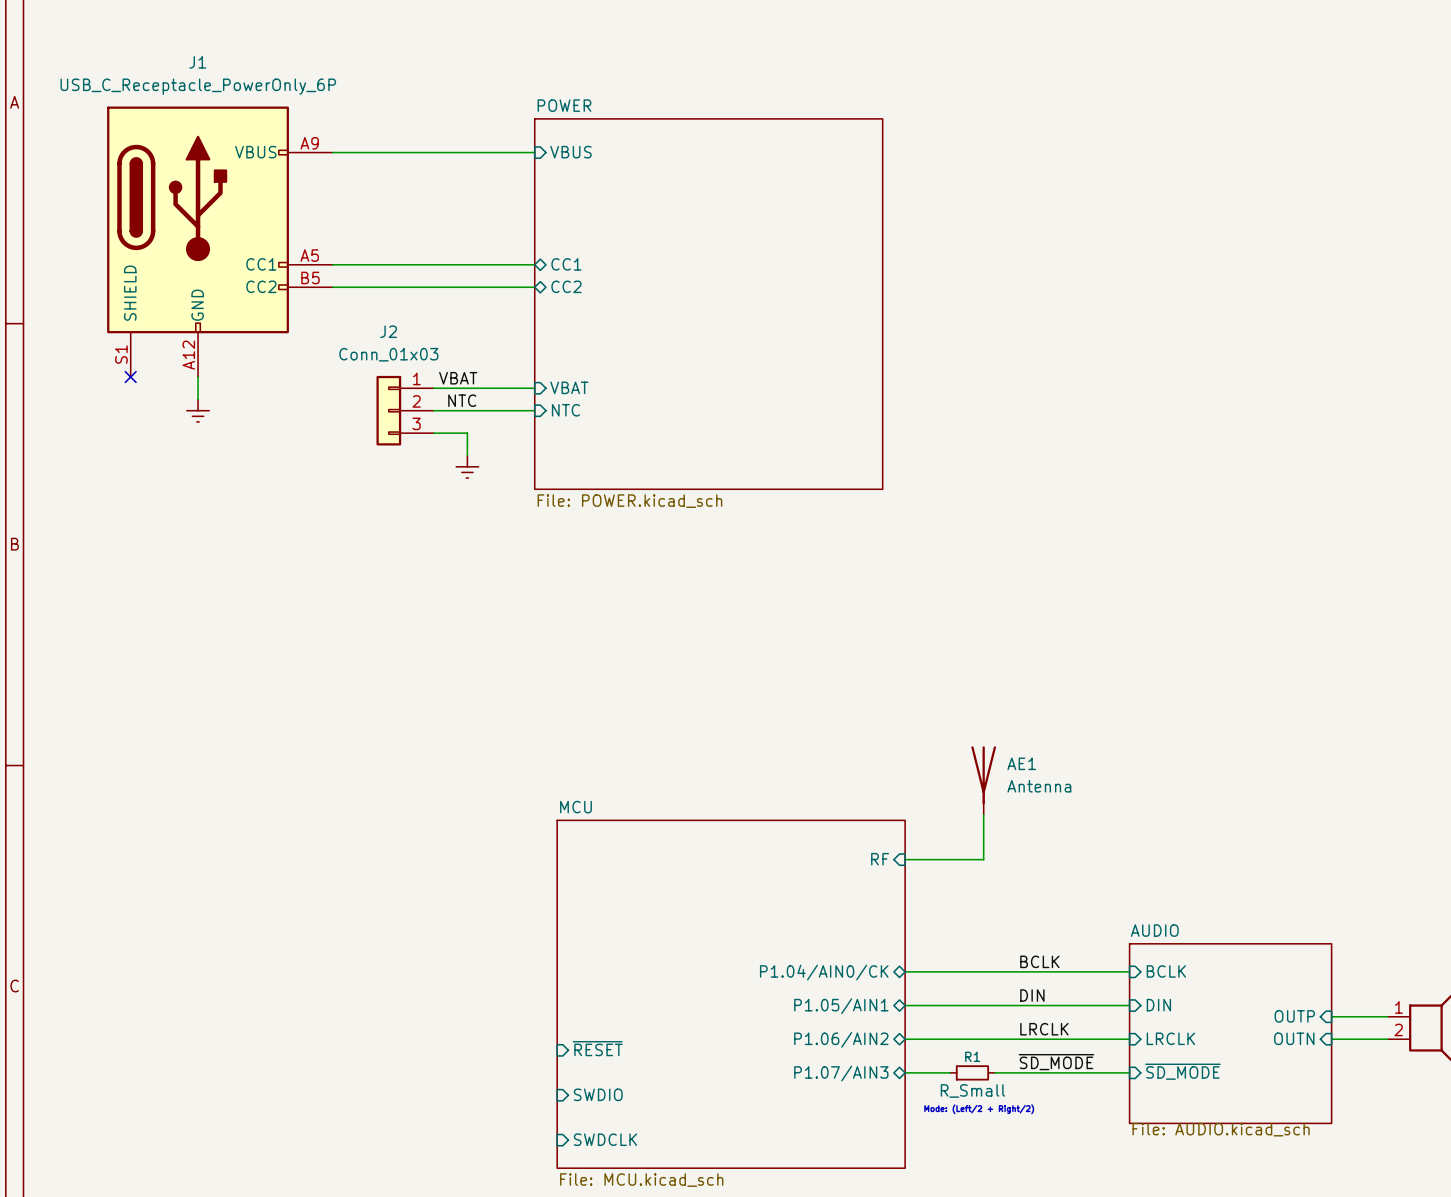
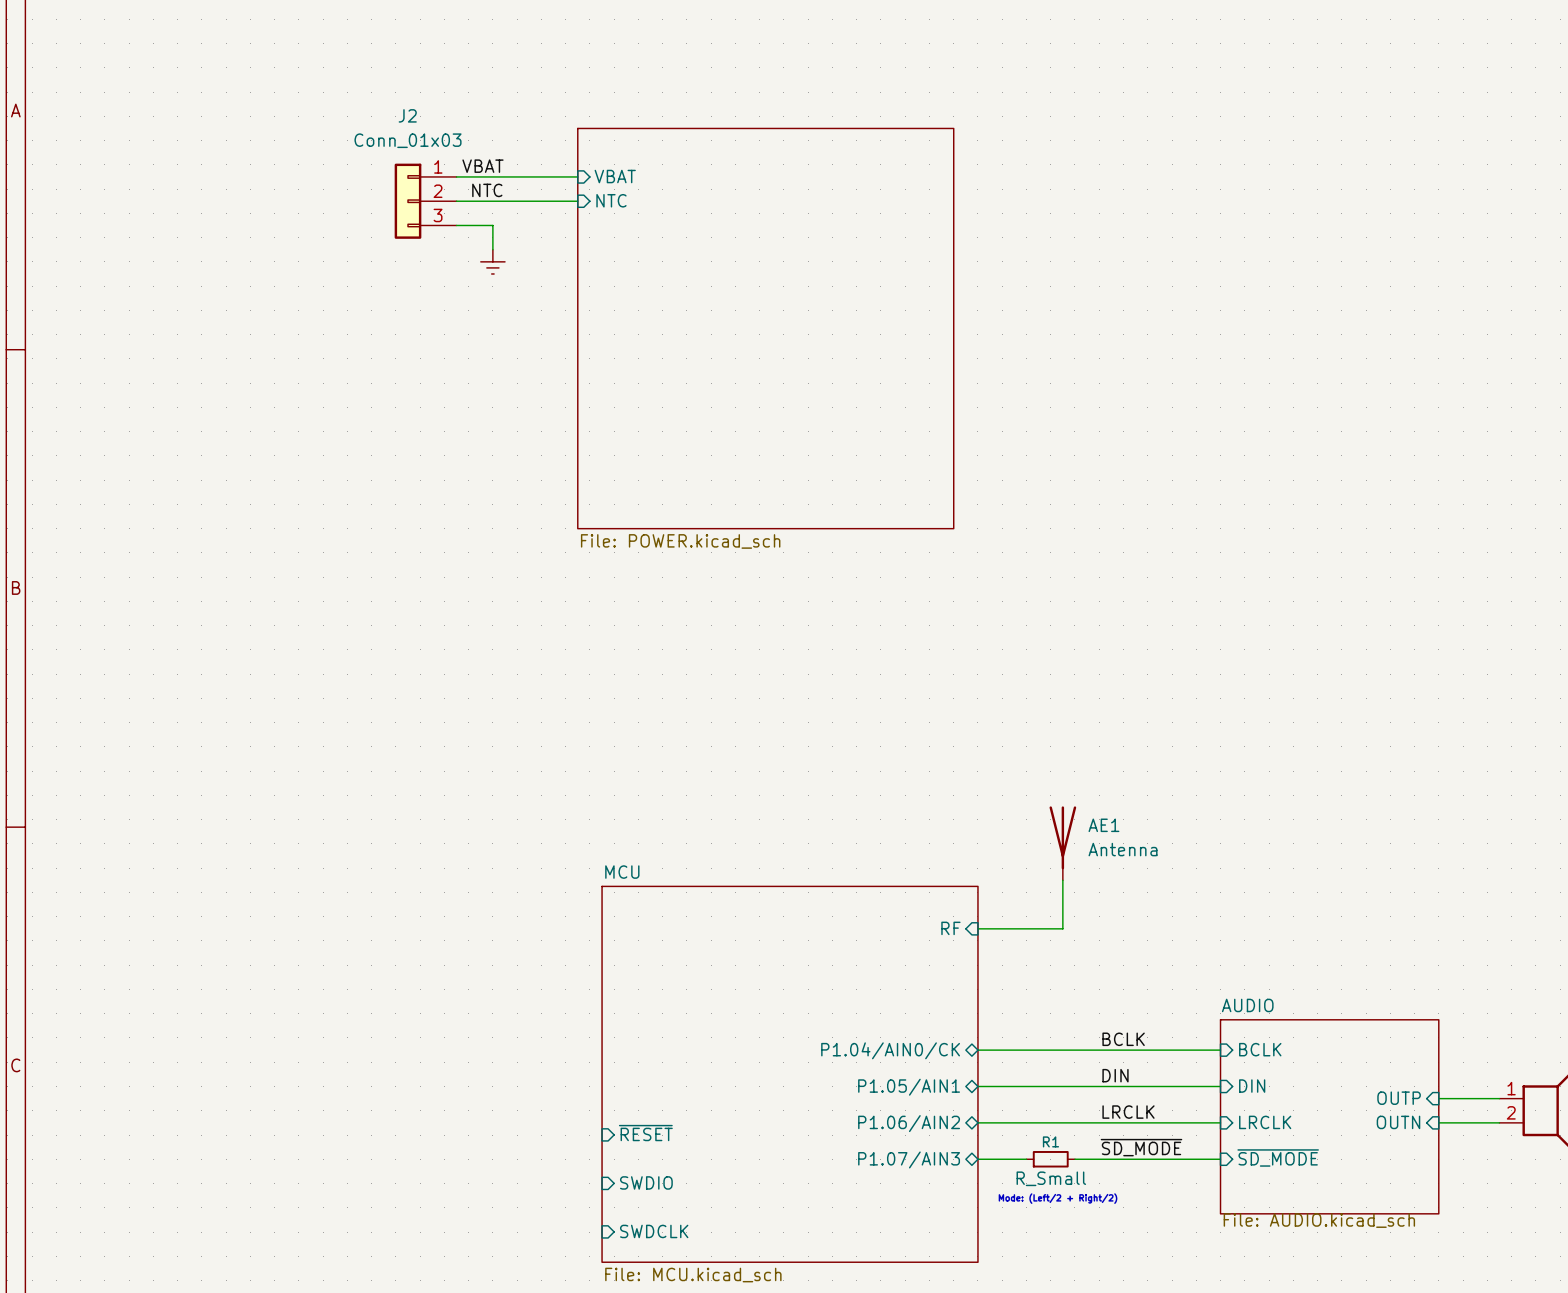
sheet POWER name: POWER (564, 105) -> none
wire: (332, 152) (534, 152) -> none
sheet pin: VBUS (570, 152) -> none
label: none -> VBAT (482, 166)
wire: none -> (456, 176) (577, 176)
sheet pin: none -> VBAT (615, 176)
label: none -> NTC (487, 190)
sheet pin: none -> NTC (611, 200)
wire: none -> (456, 201) (577, 201)
wire: none -> (456, 225) (492, 225) (492, 249)
J1: USB_C_Receptacle_PowerOnly_6P (219, 241) -> none
power symbol: none -> (492, 261)
wire: (332, 264) (534, 264) -> none
sheet pin: CC1 (566, 264) -> none
sheet pin: CC2 (566, 286) -> none
wire: (332, 287) (534, 287) -> none
no-connect mark: (130, 377) -> none
wire: (198, 377) (198, 399) -> none
label: VBAT (458, 378) -> none
sheet pin: VBAT (569, 387) -> none
wire: (433, 388) (534, 388) -> none
label: NTC (462, 400) -> none
power symbol: (198, 410) -> none
J2 position: (405, 410) -> (425, 201)
wire: (433, 410) (534, 410) -> none
sheet pin: NTC (565, 410) -> none
wire: (433, 433) (467, 433) (467, 455) -> none
power symbol: (467, 466) -> none

